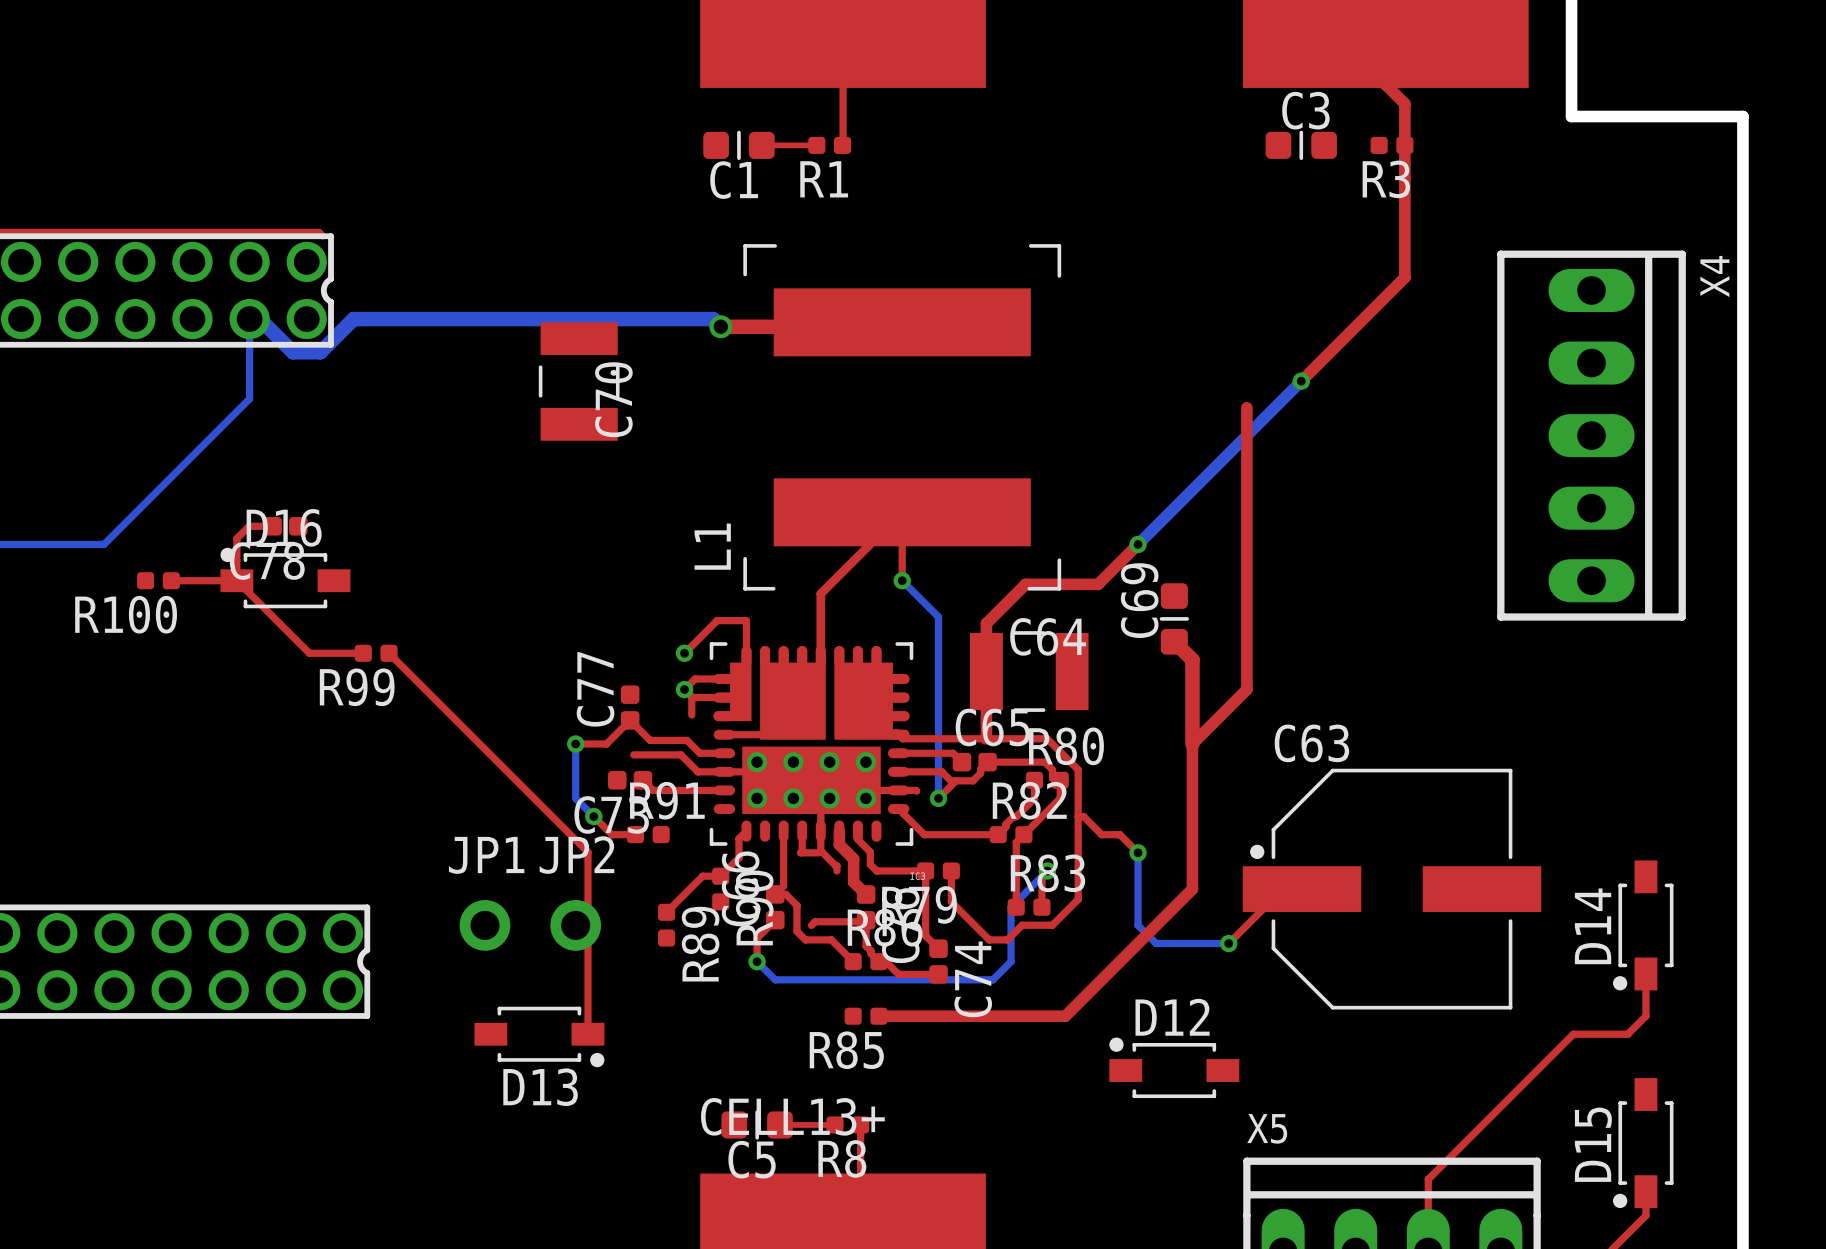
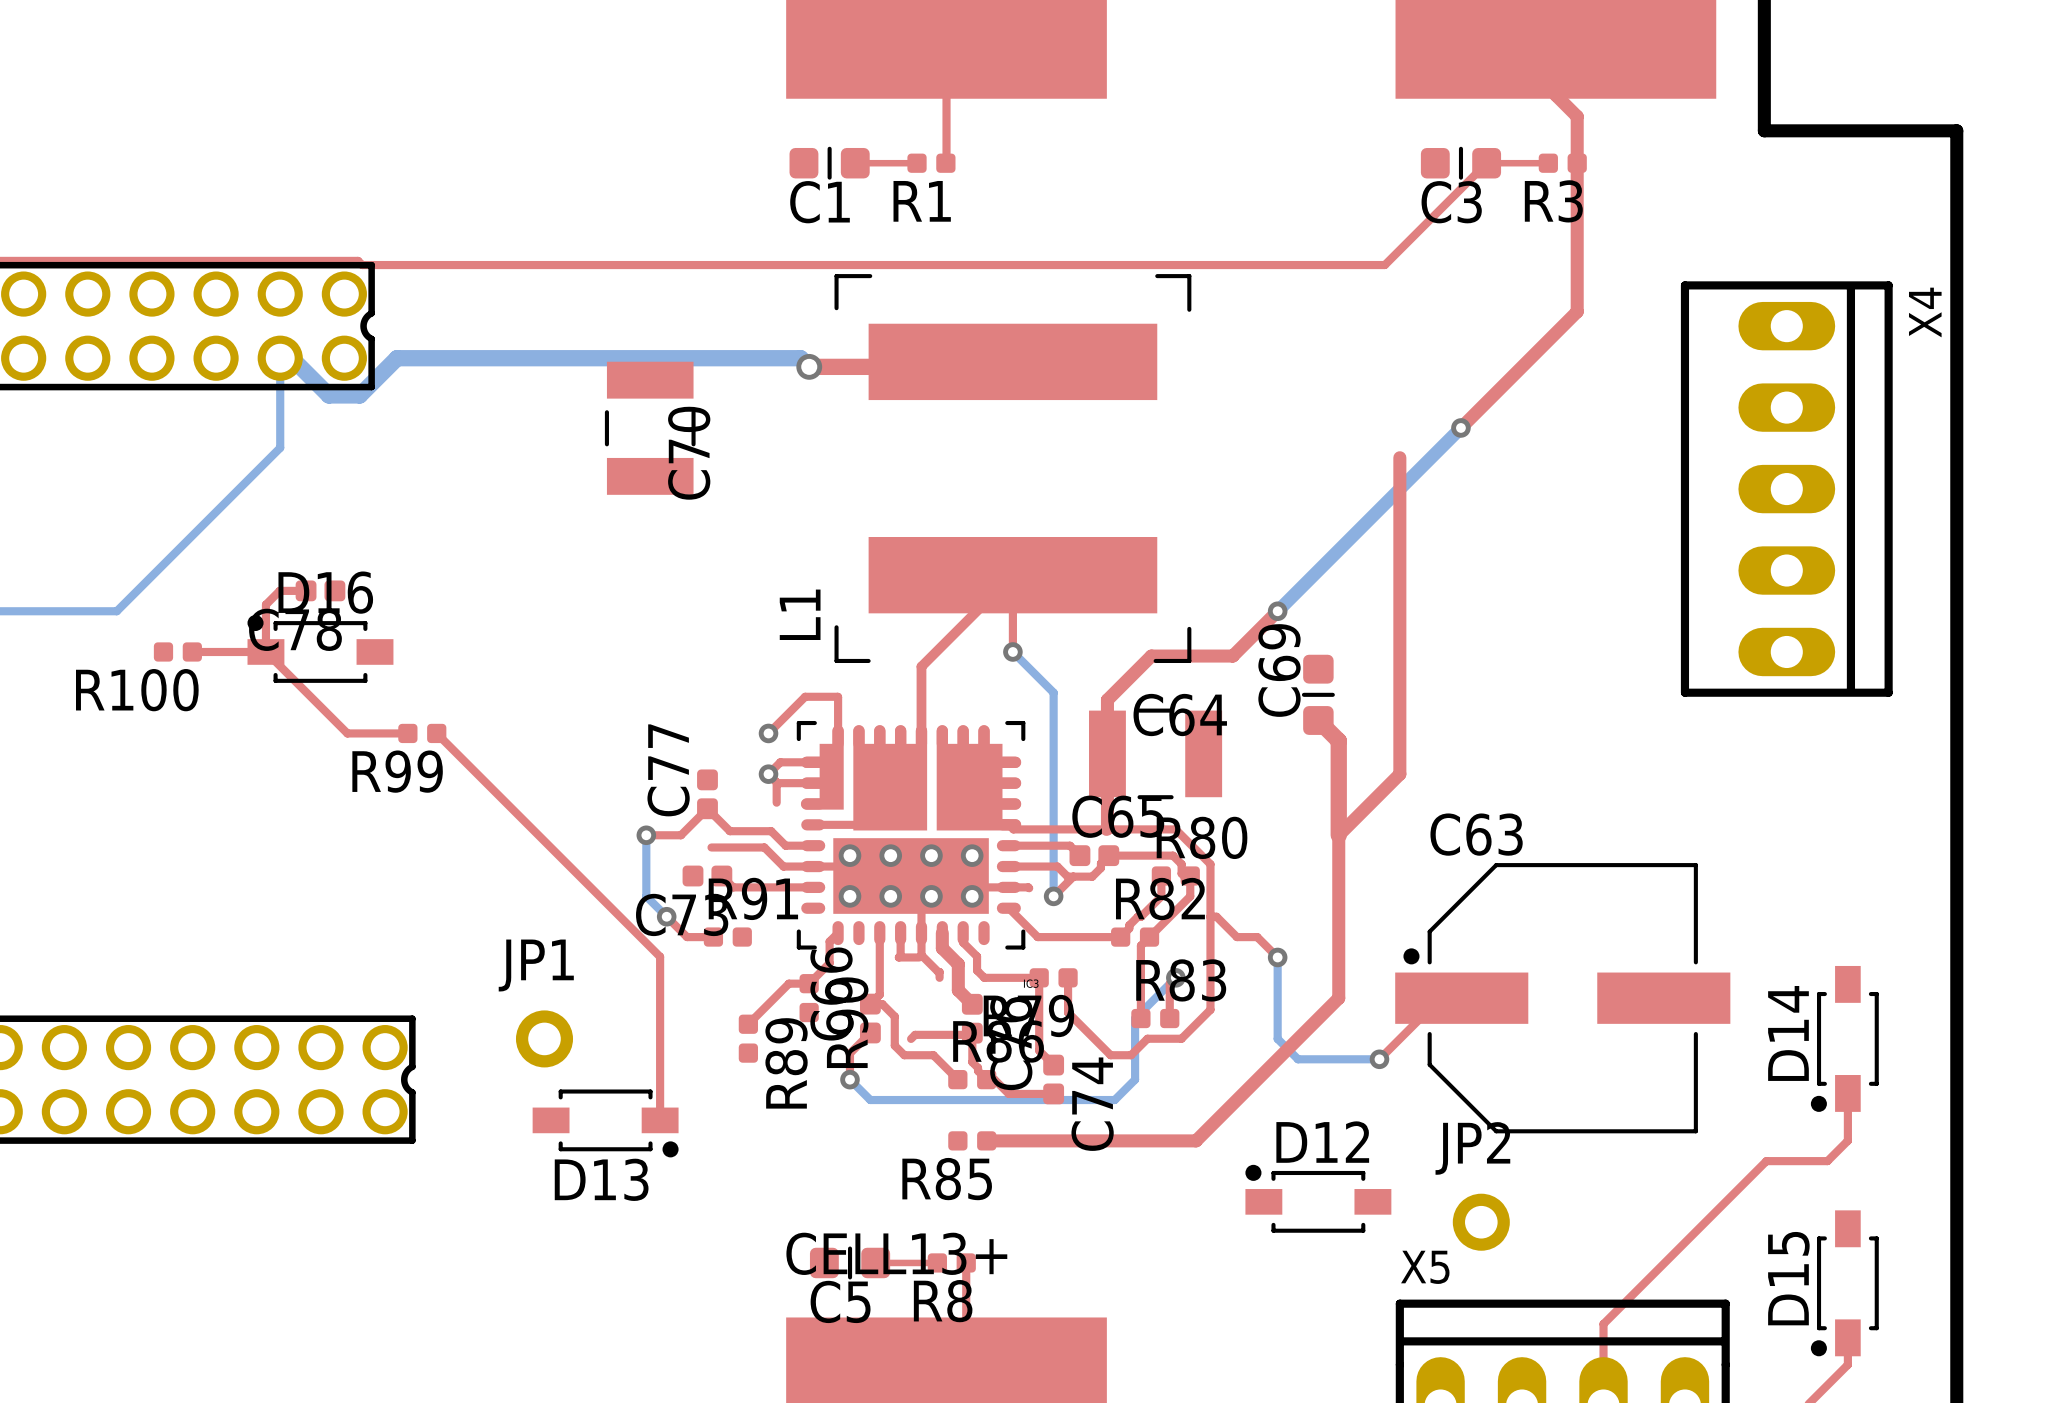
C3 name position: C3 (1305, 110) -> C3 (1451, 202)
top track: none -> (1548, 163) (1486, 163) (1384, 265) (362, 265)
JP2 position: (575, 925) -> (1481, 1222)
top track: (587, 997) (587, 1034) -> none
D13 position: (539, 1036) -> (605, 1123)

